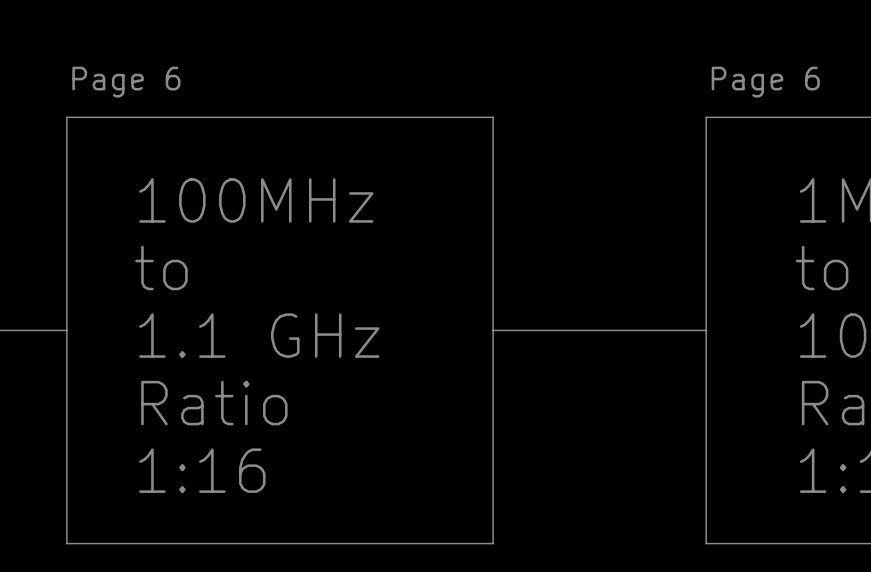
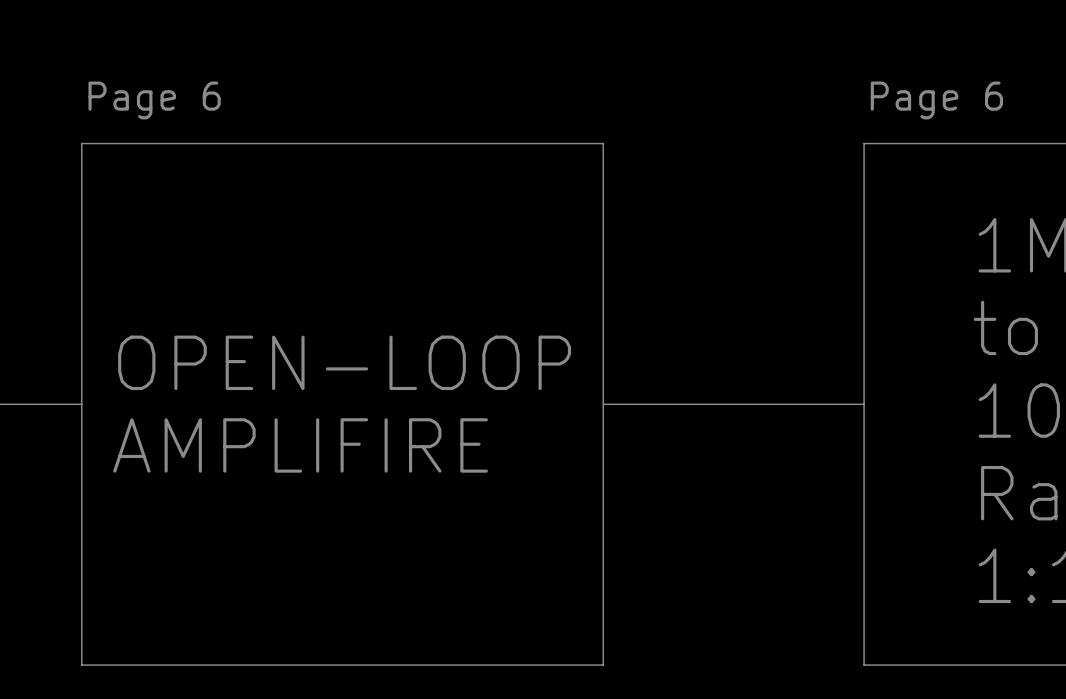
text: 100MHz (256, 200) -> none
text: to (161, 268) -> none
text: none -> OPEN-LOOP (344, 362)
text: 1.1 GHz (259, 335) -> none
text: none -> AMPLIFIRE (300, 445)
text: Ratio (214, 403) -> none
text: 1:16 (202, 470) -> none

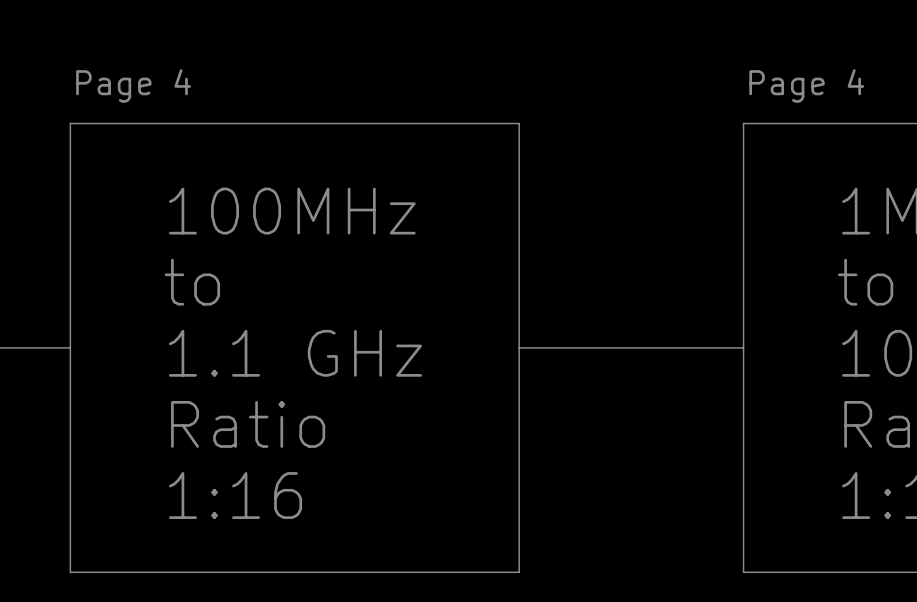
text: Page 6 (154, 100) -> Page 4 (133, 85)
text: Page 6 (936, 100) -> Page 4 (806, 85)
text: none -> 100MHz (292, 211)
text: none -> to (192, 282)
text: OPEN-LOOP (344, 362) -> none
text: none -> 1.1 GHz (295, 353)
text: AMPLIFIRE (300, 445) -> none
text: none -> Ratio (248, 424)
text: none -> 1:16 (235, 495)

